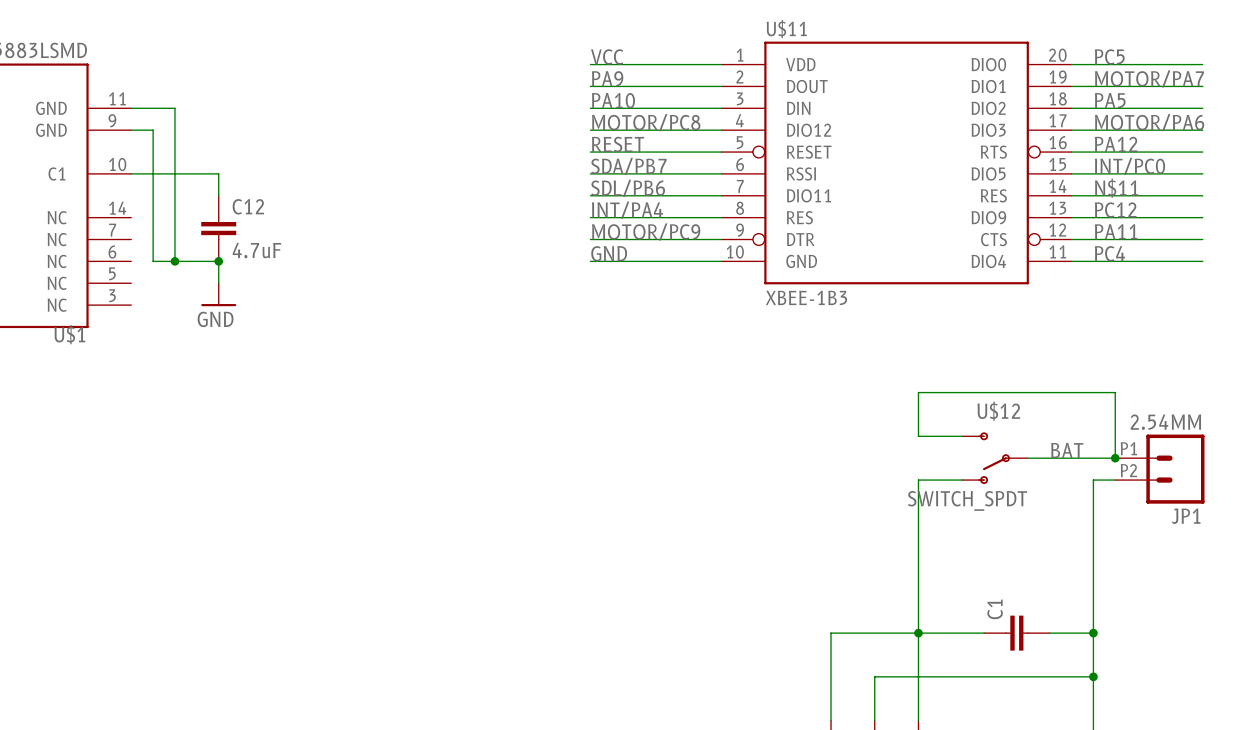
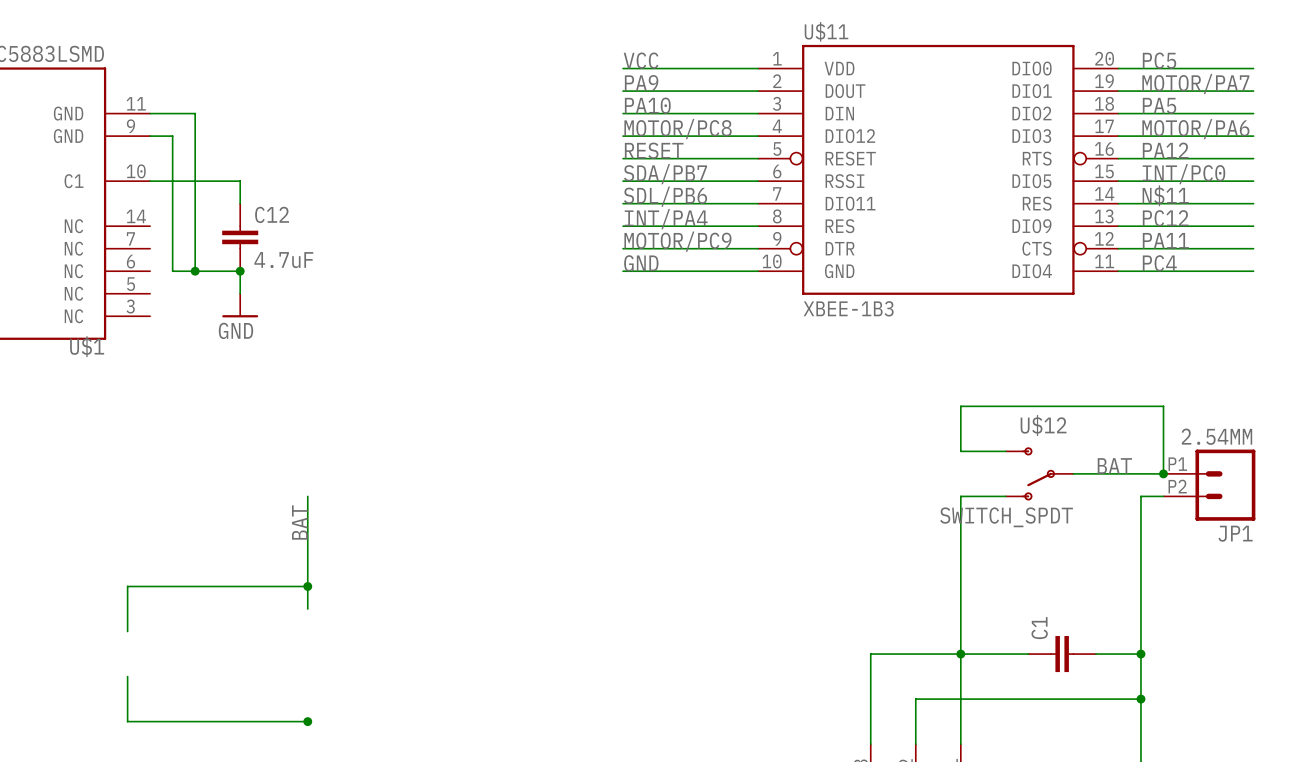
wire: none -> (307, 496) (307, 609)
label: none -> BAT (299, 522)
wire: none -> (307, 586) (127, 586) (127, 631)
junction: none -> (307, 586)
wire: none -> (127, 676) (127, 721) (307, 721)
junction: none -> (307, 721)

